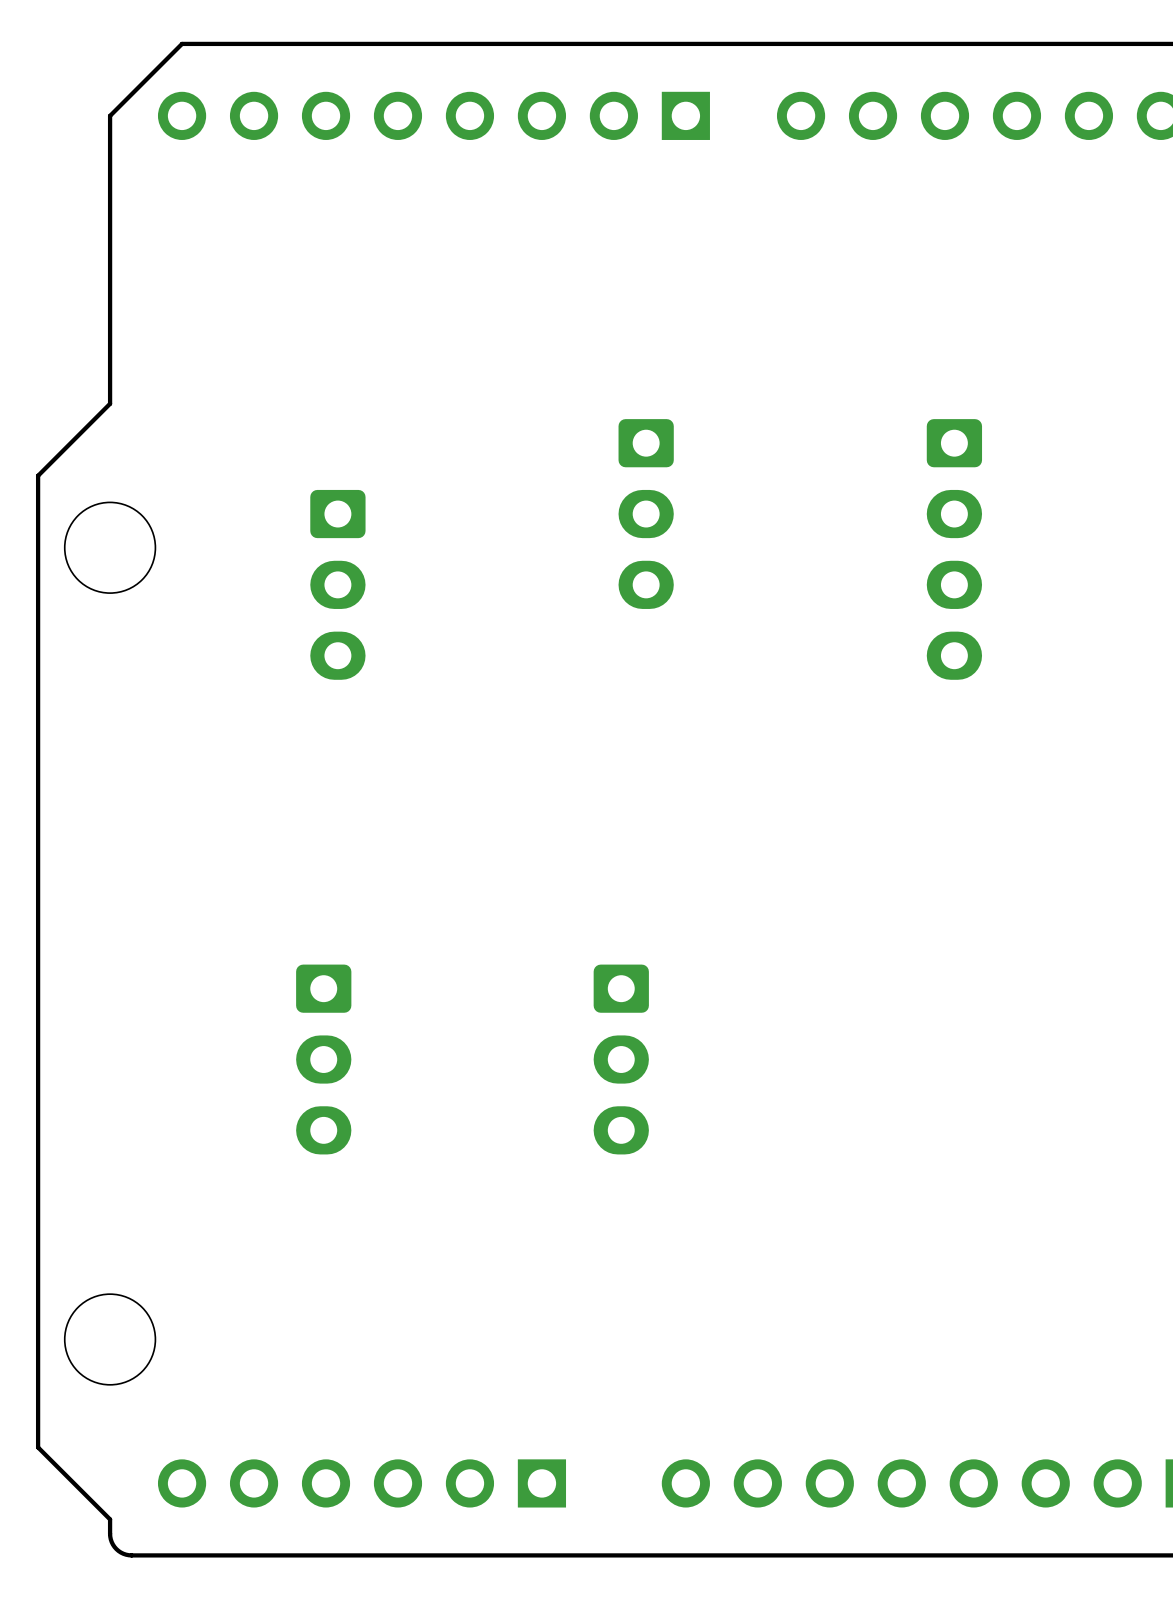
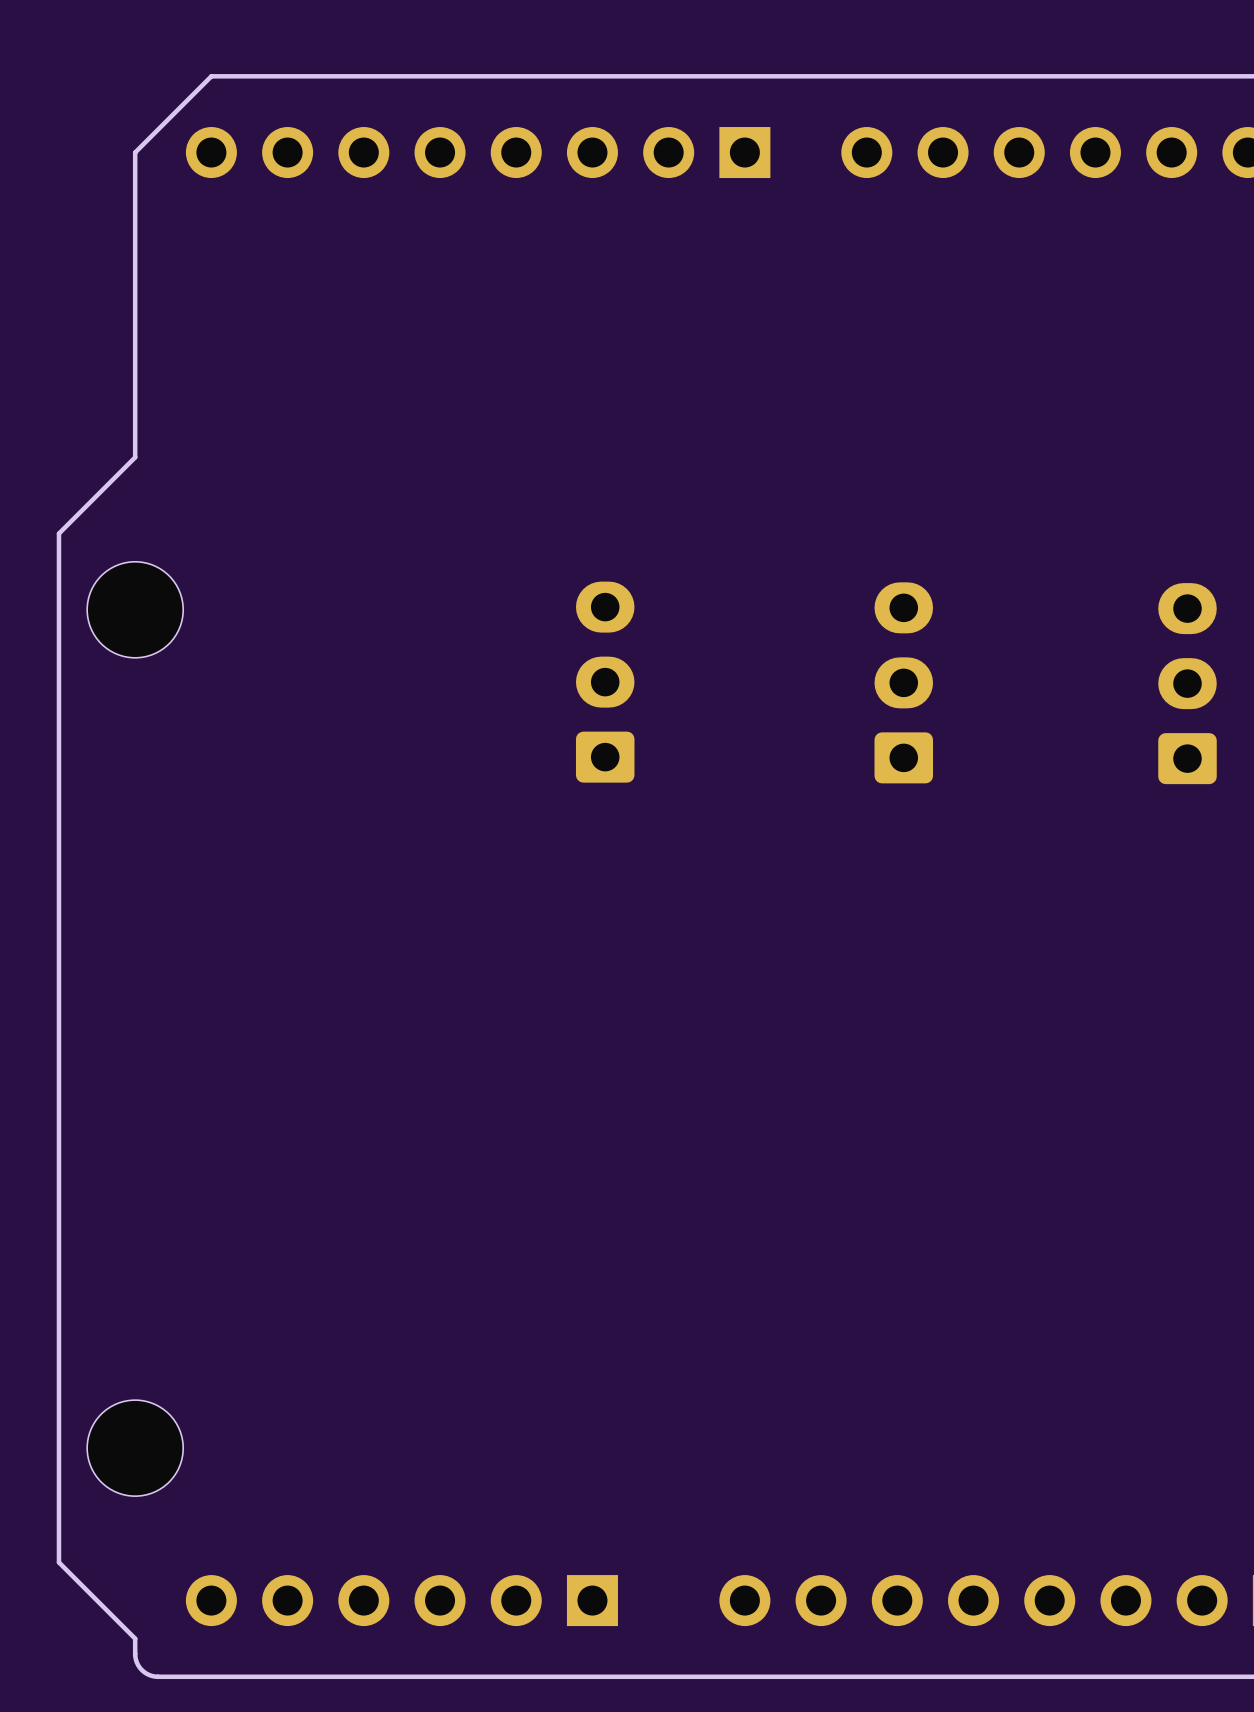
part: (646, 514) -> none
part: (954, 549) -> none
part: (337, 584) -> none
part: none -> (605, 682)
part: none -> (903, 682)
part: none -> (1187, 683)
part: (323, 1059) -> none
part: (621, 1059) -> none

